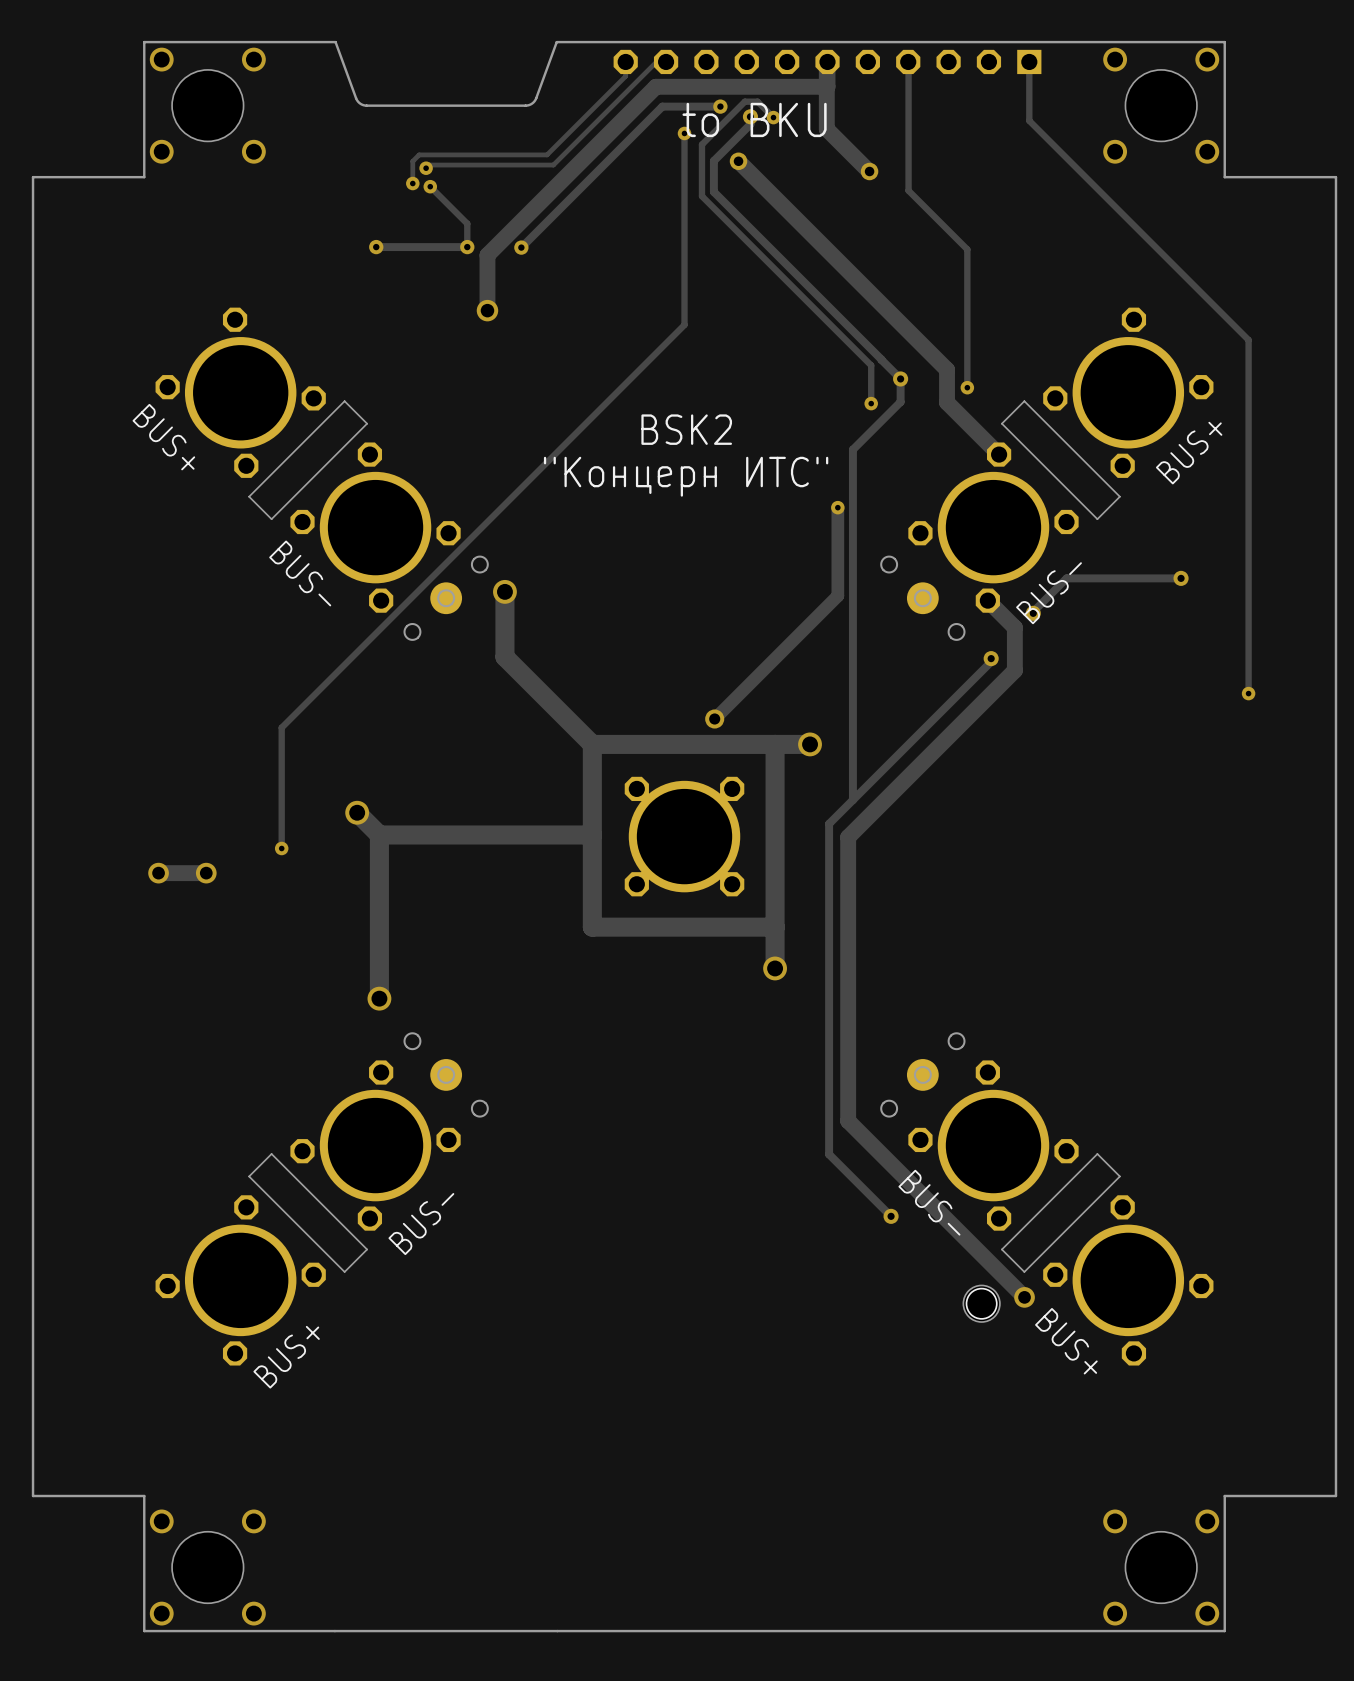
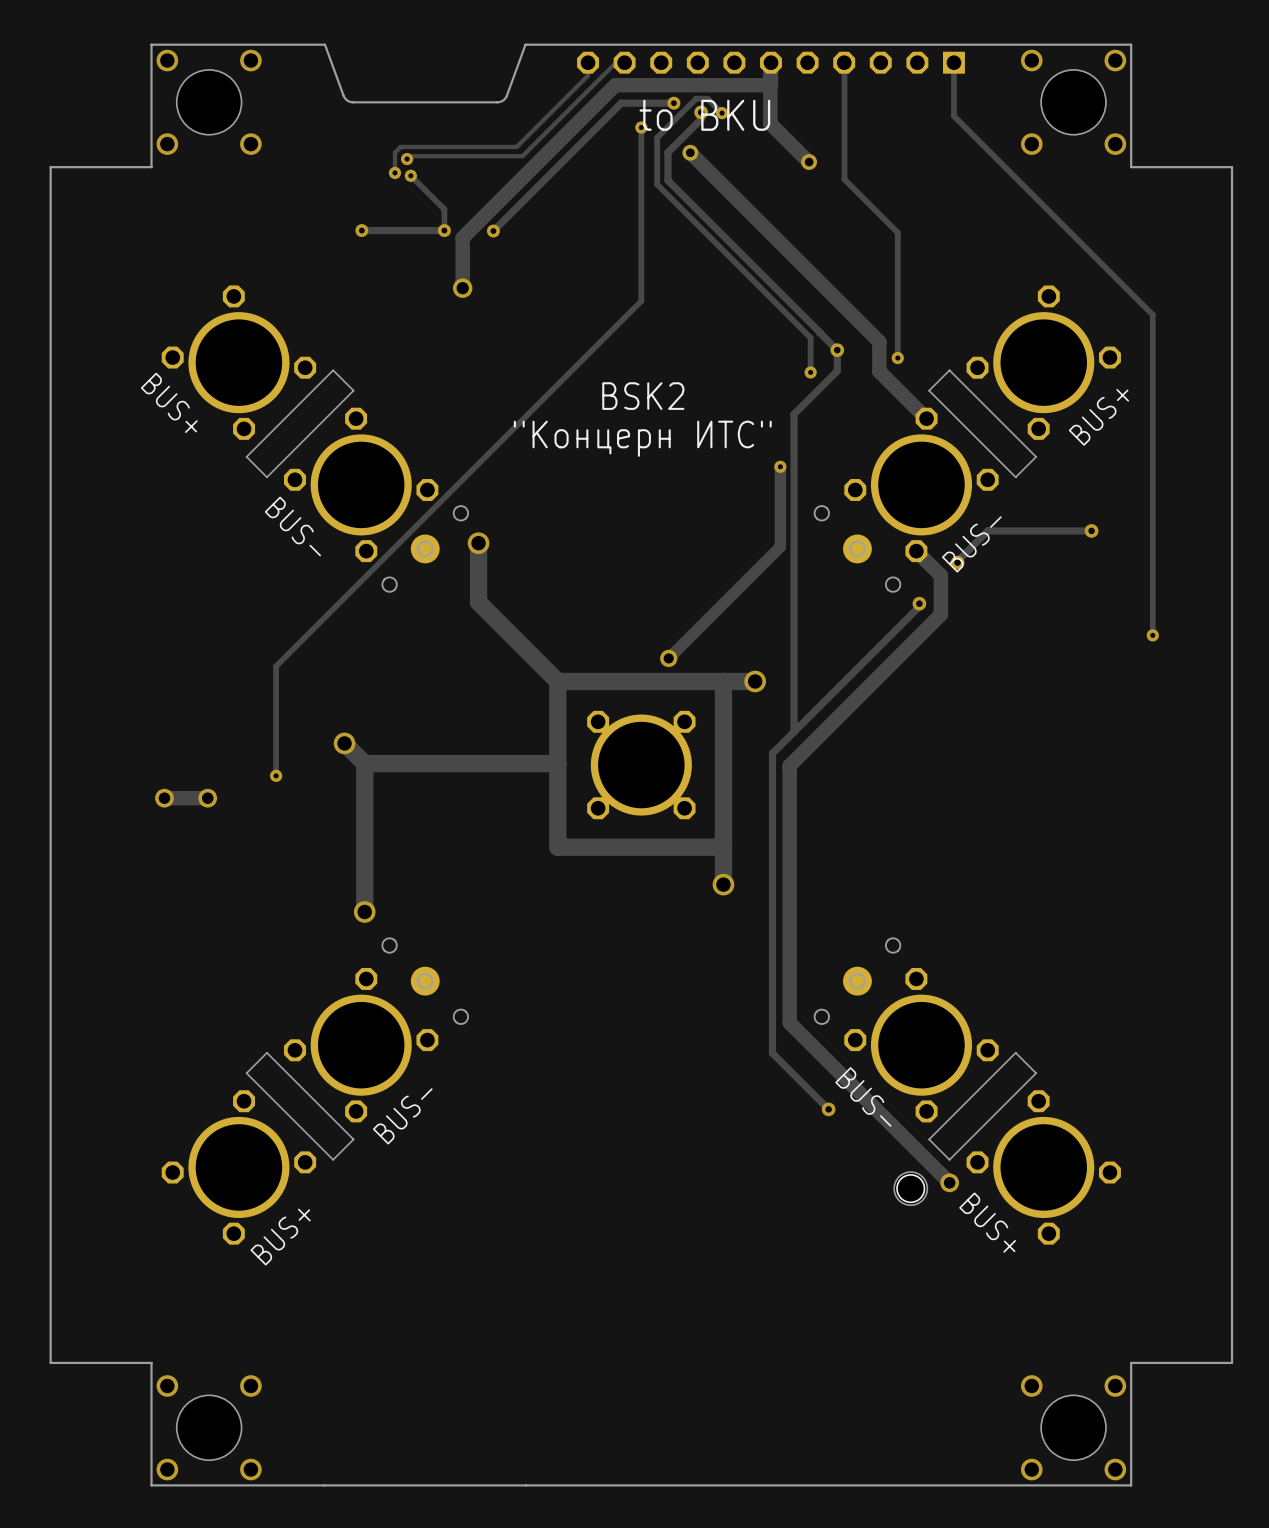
part footprint: [403, 555, 489, 641] -> [381, 505, 470, 593]
part footprint: [880, 555, 966, 641] -> [813, 505, 902, 593]
part footprint: [403, 1032, 489, 1118] -> [381, 937, 470, 1025]
part footprint: [880, 1032, 966, 1118] -> [813, 937, 902, 1025]

